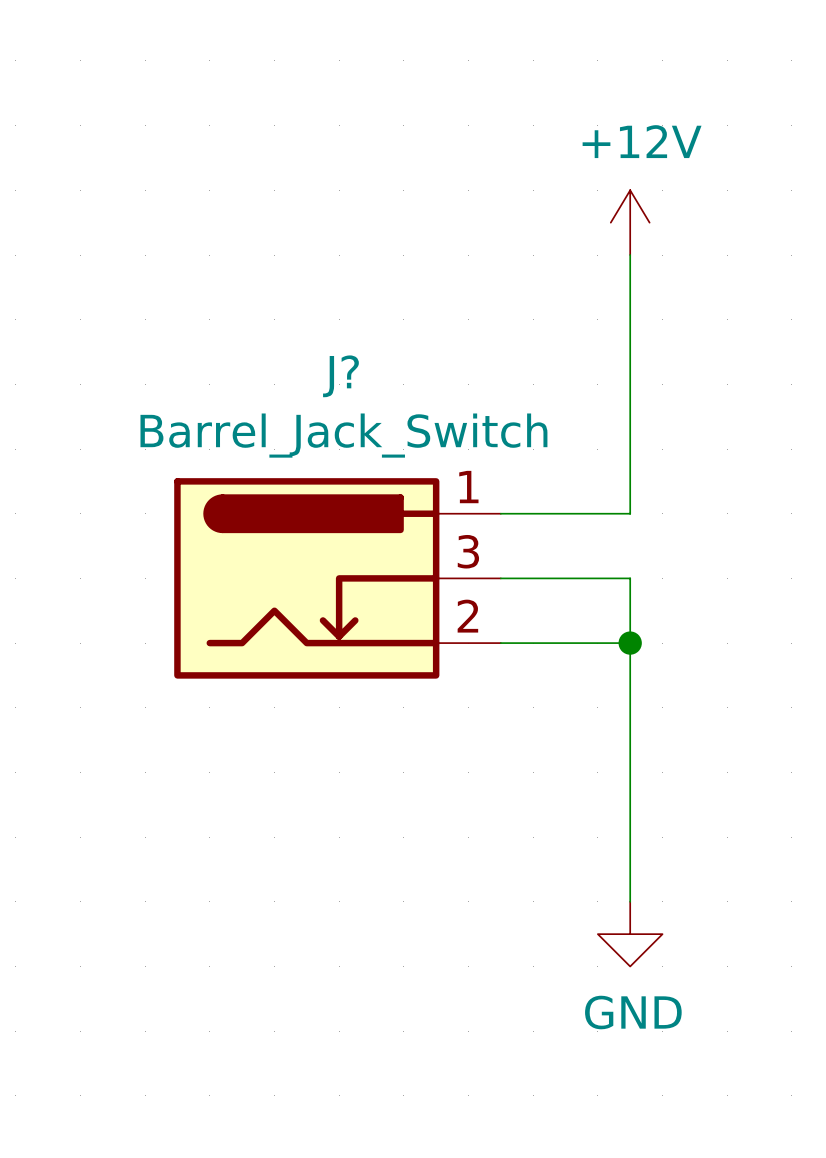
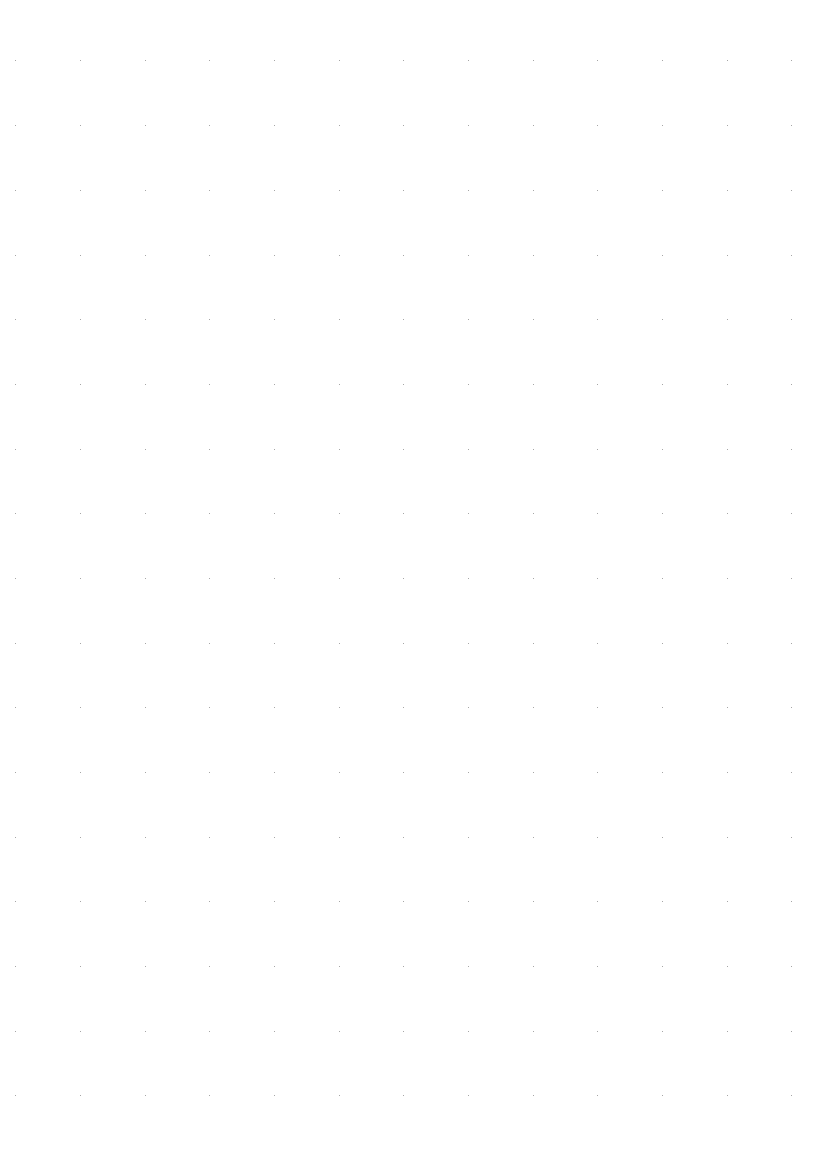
power symbol: +12V (630, 222) -> none
wire: (630, 255) (630, 513) (500, 513) -> none
J?: Barrel_Jack_Switch (337, 578) -> none
wire: (500, 578) (630, 578) (630, 901) -> none
wire: (500, 643) (630, 643) -> none
junction: (630, 643) -> none
power symbol: GND (630, 934) -> none

